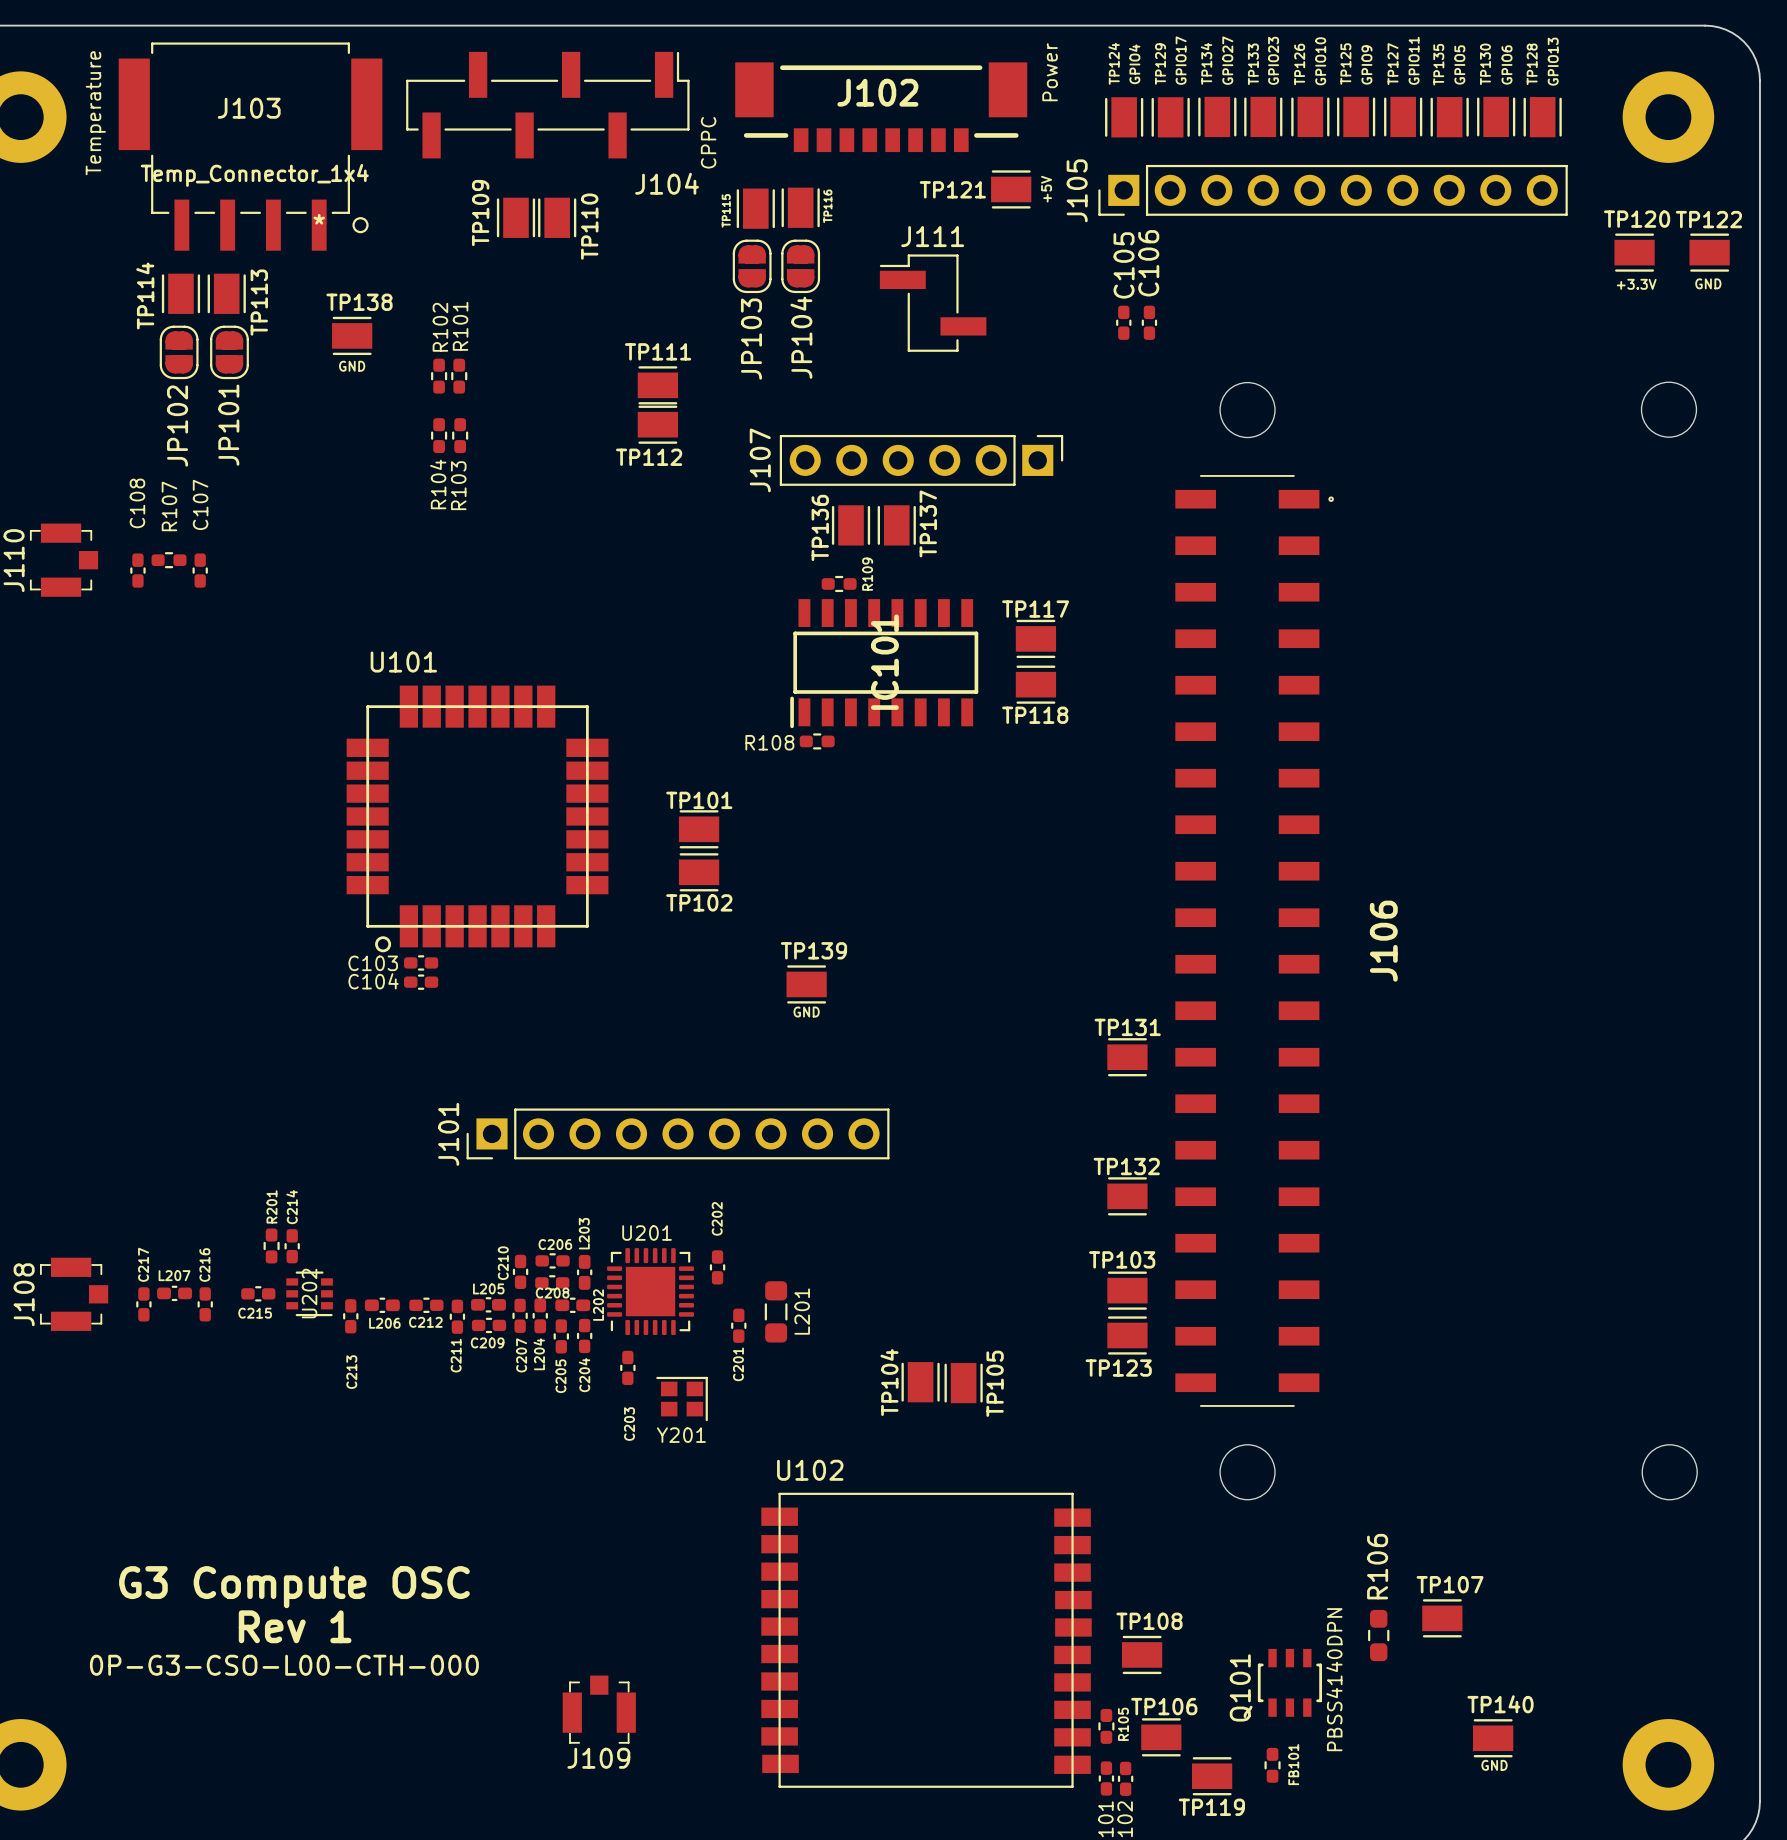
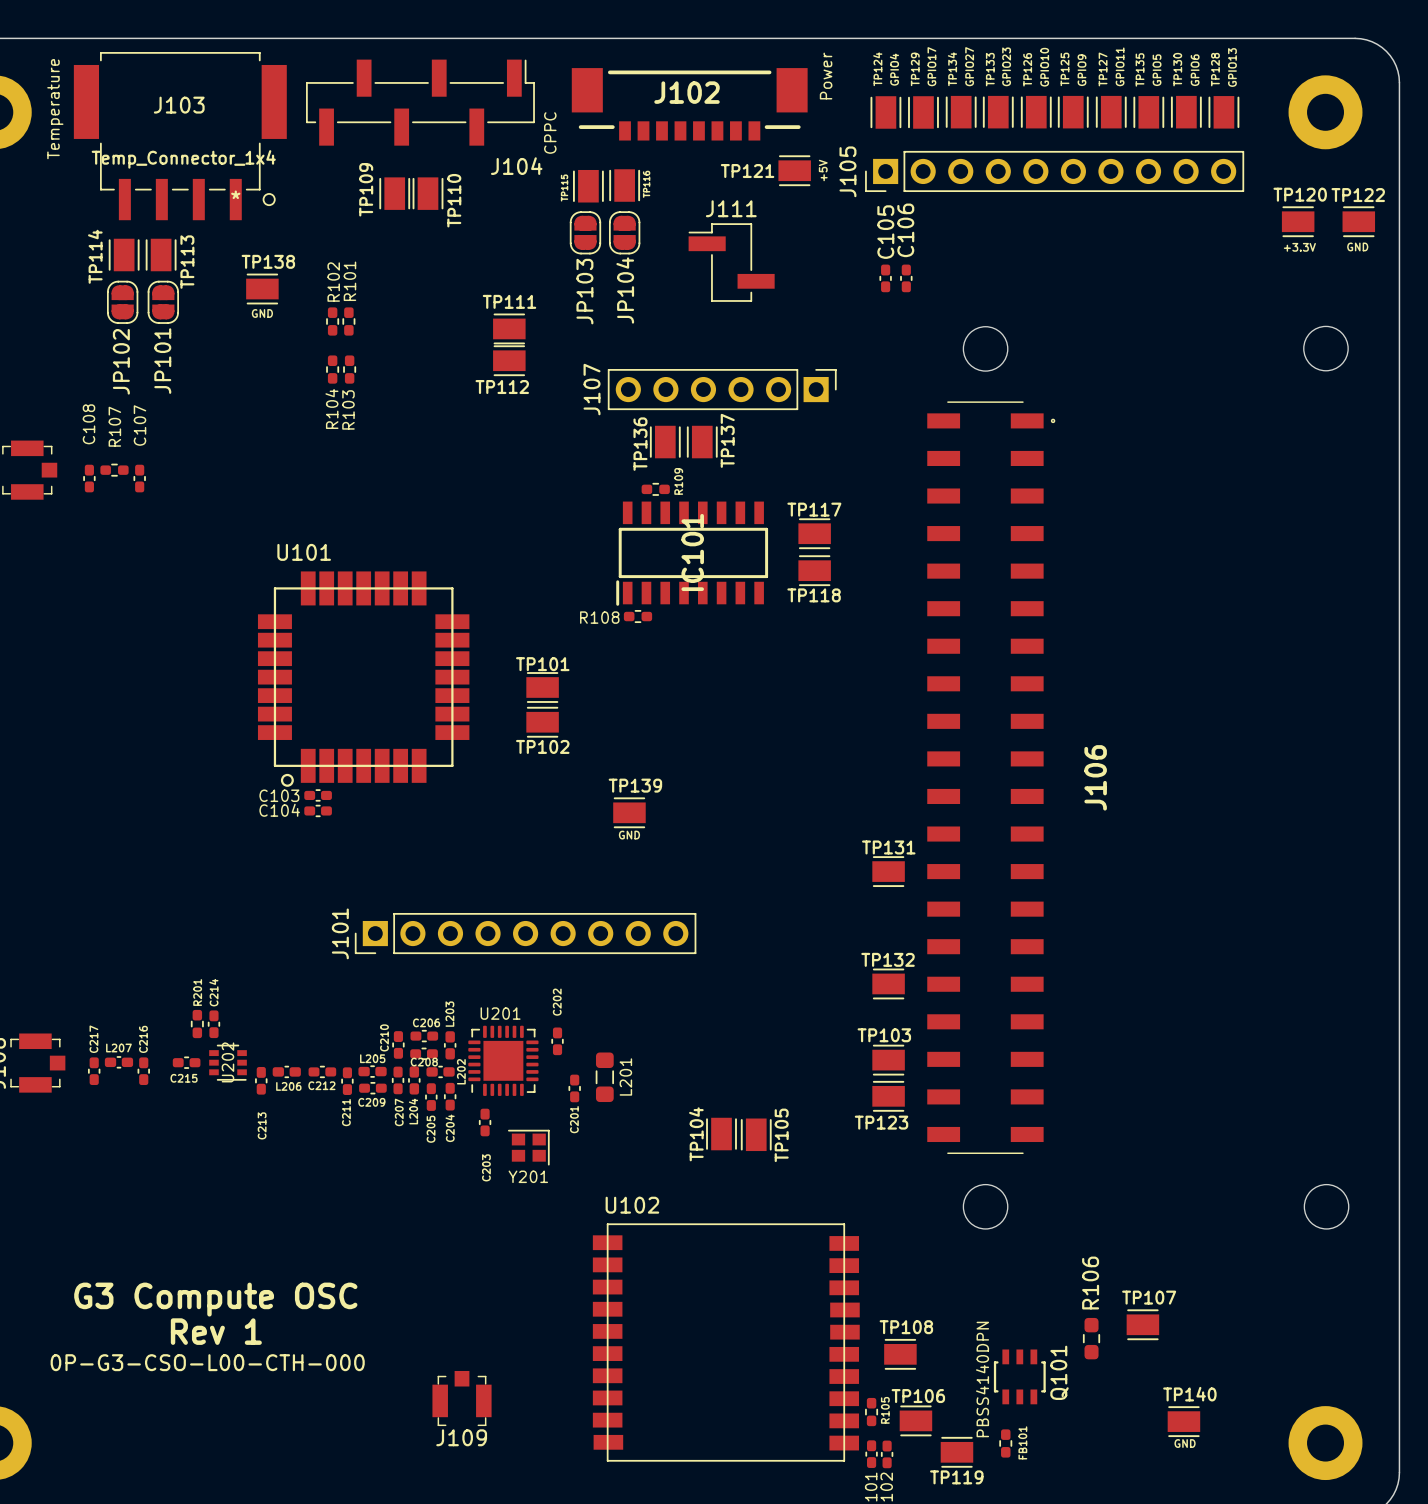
Q101 value position: PBSS4140DPN (1334, 1679) -> PBSS4140DPN (982, 1379)
Q101 name position: Q101 (1241, 1687) -> Q101 (1059, 1372)

